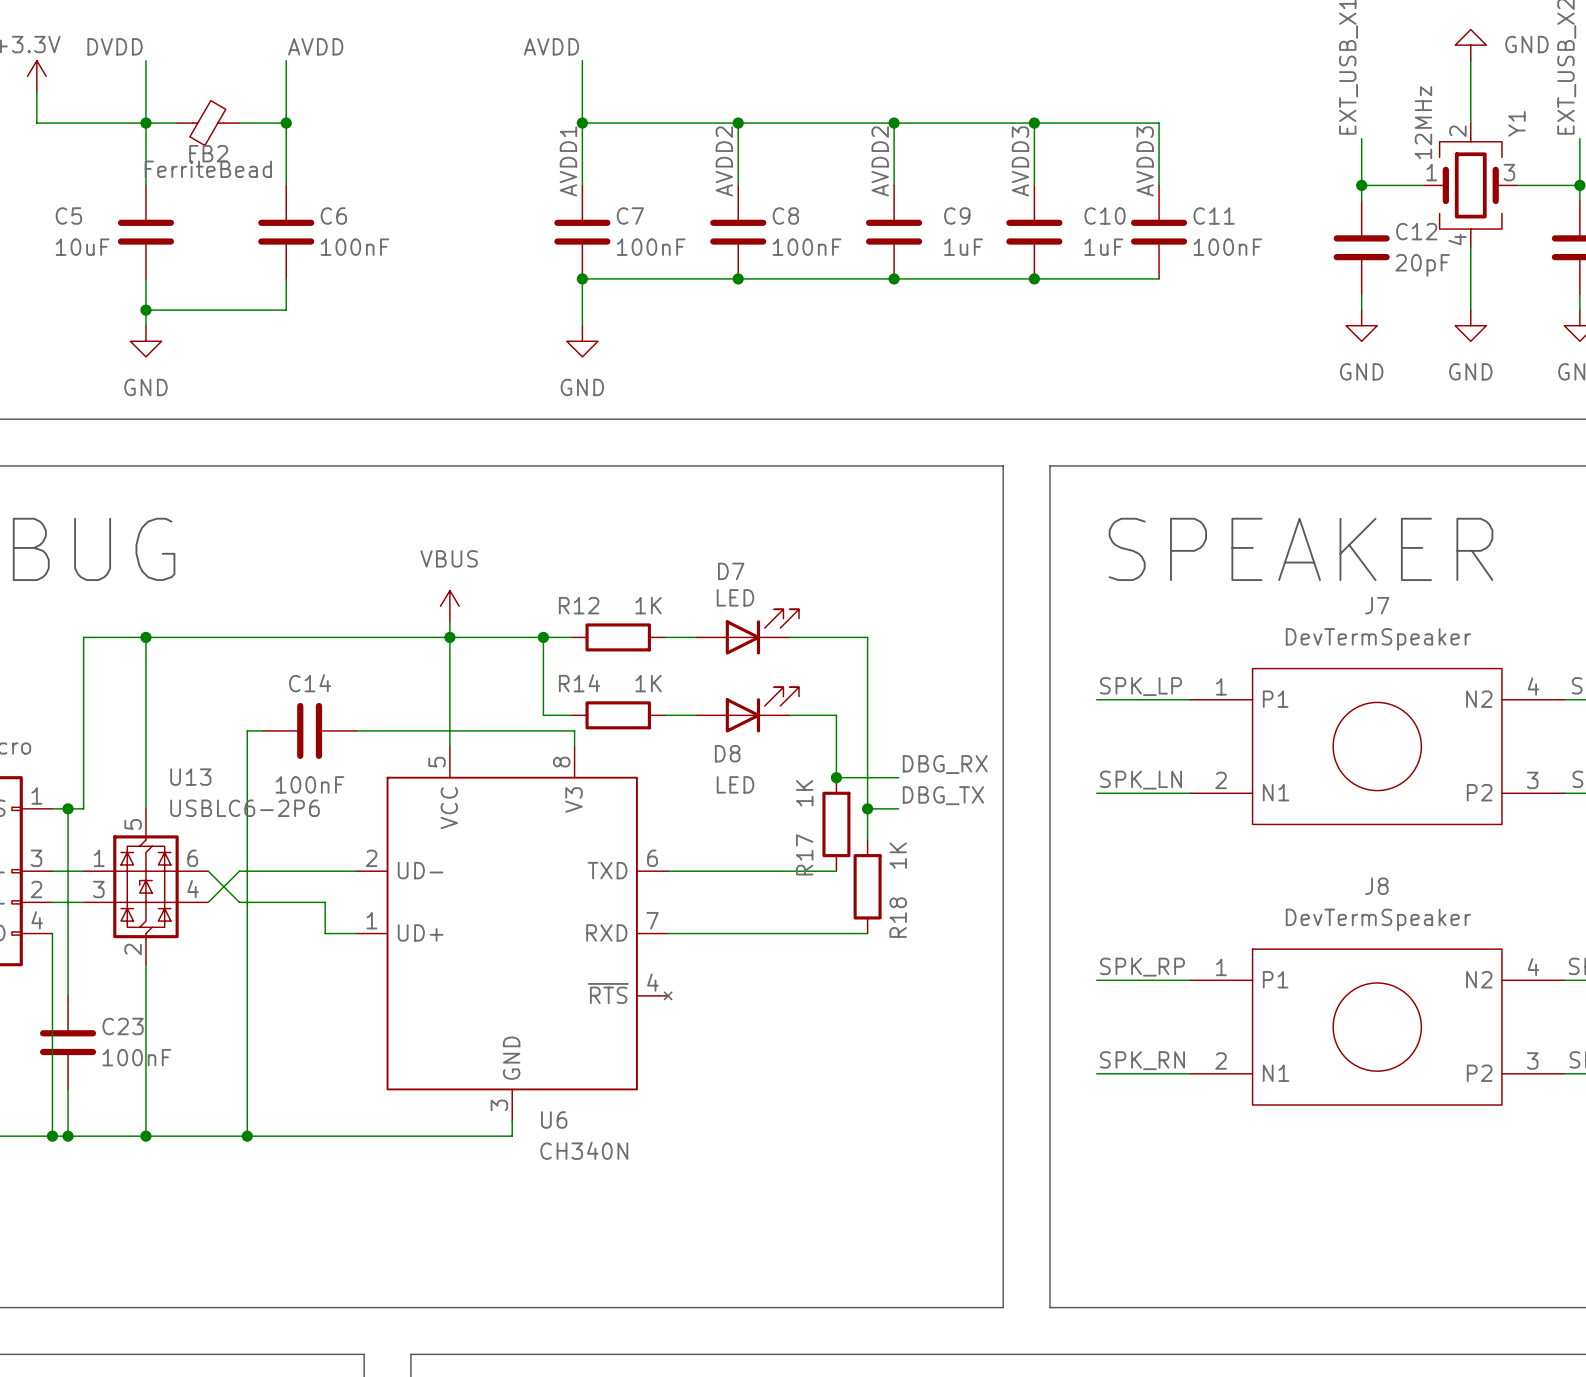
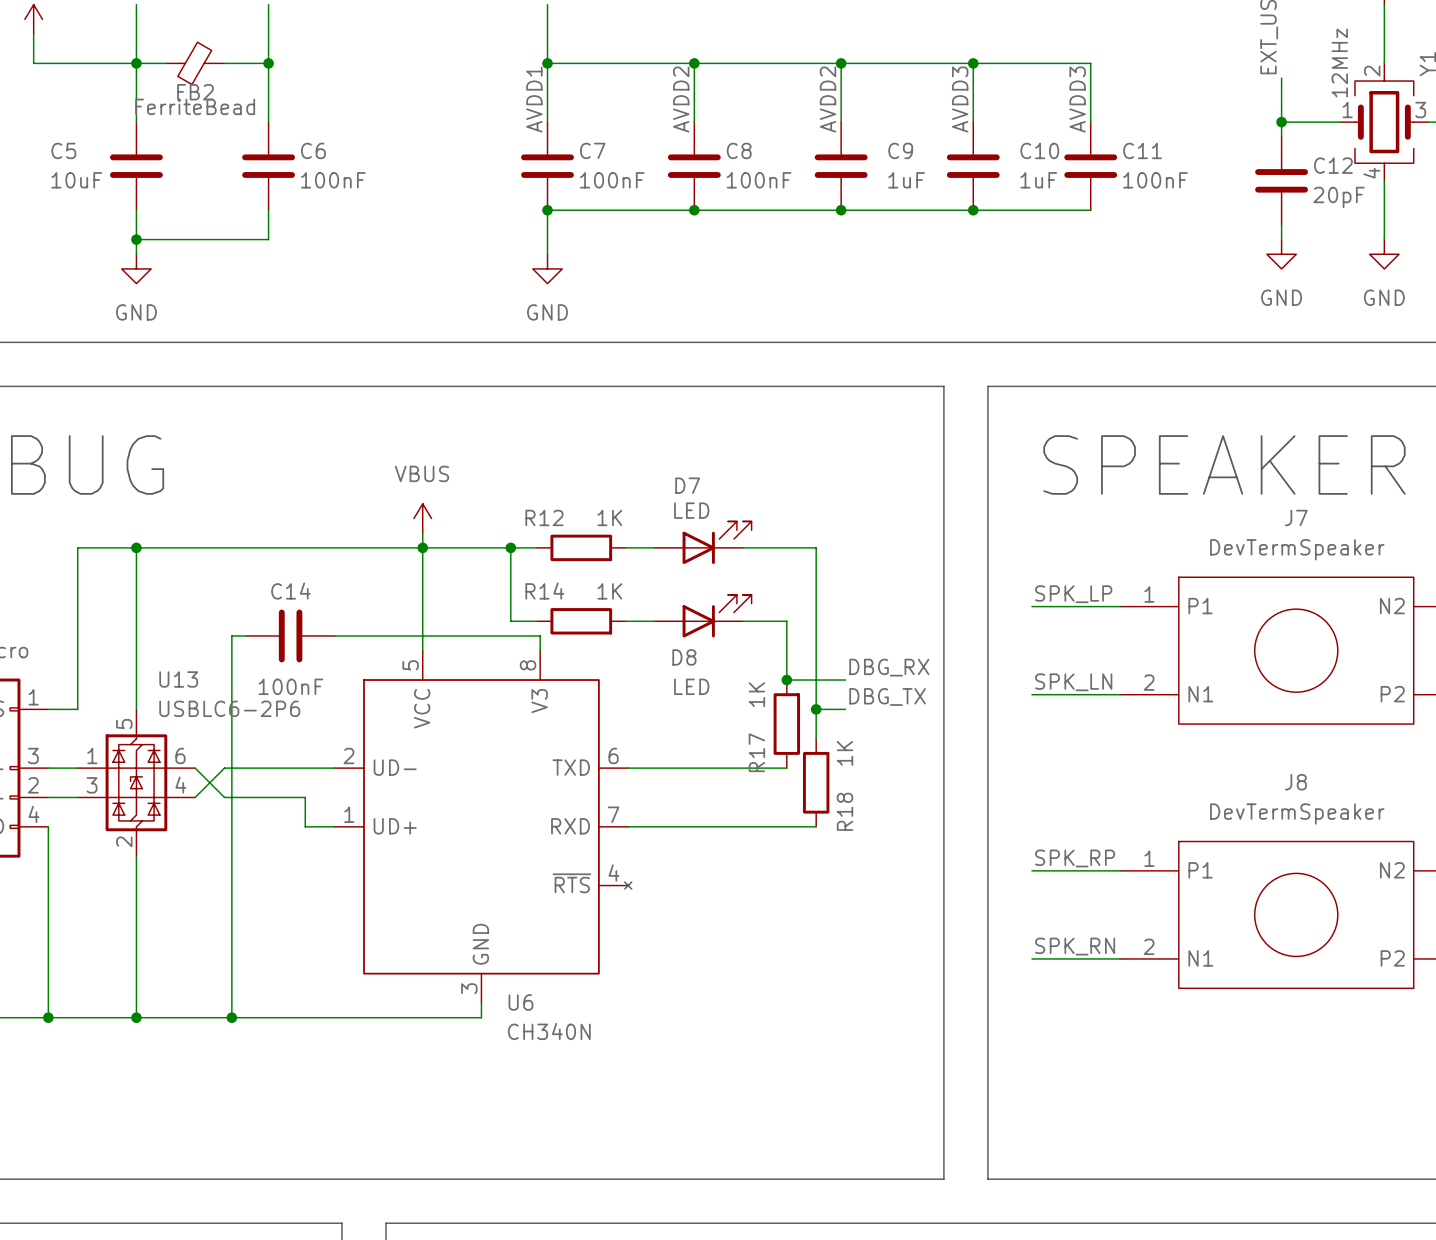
wire: (68, 808) (68, 995) -> none
junction: (68, 808) -> none
C23: 100nF (68, 1042) -> none
wire: (68, 1089) (68, 1136) -> none
junction: (68, 1136) -> none

